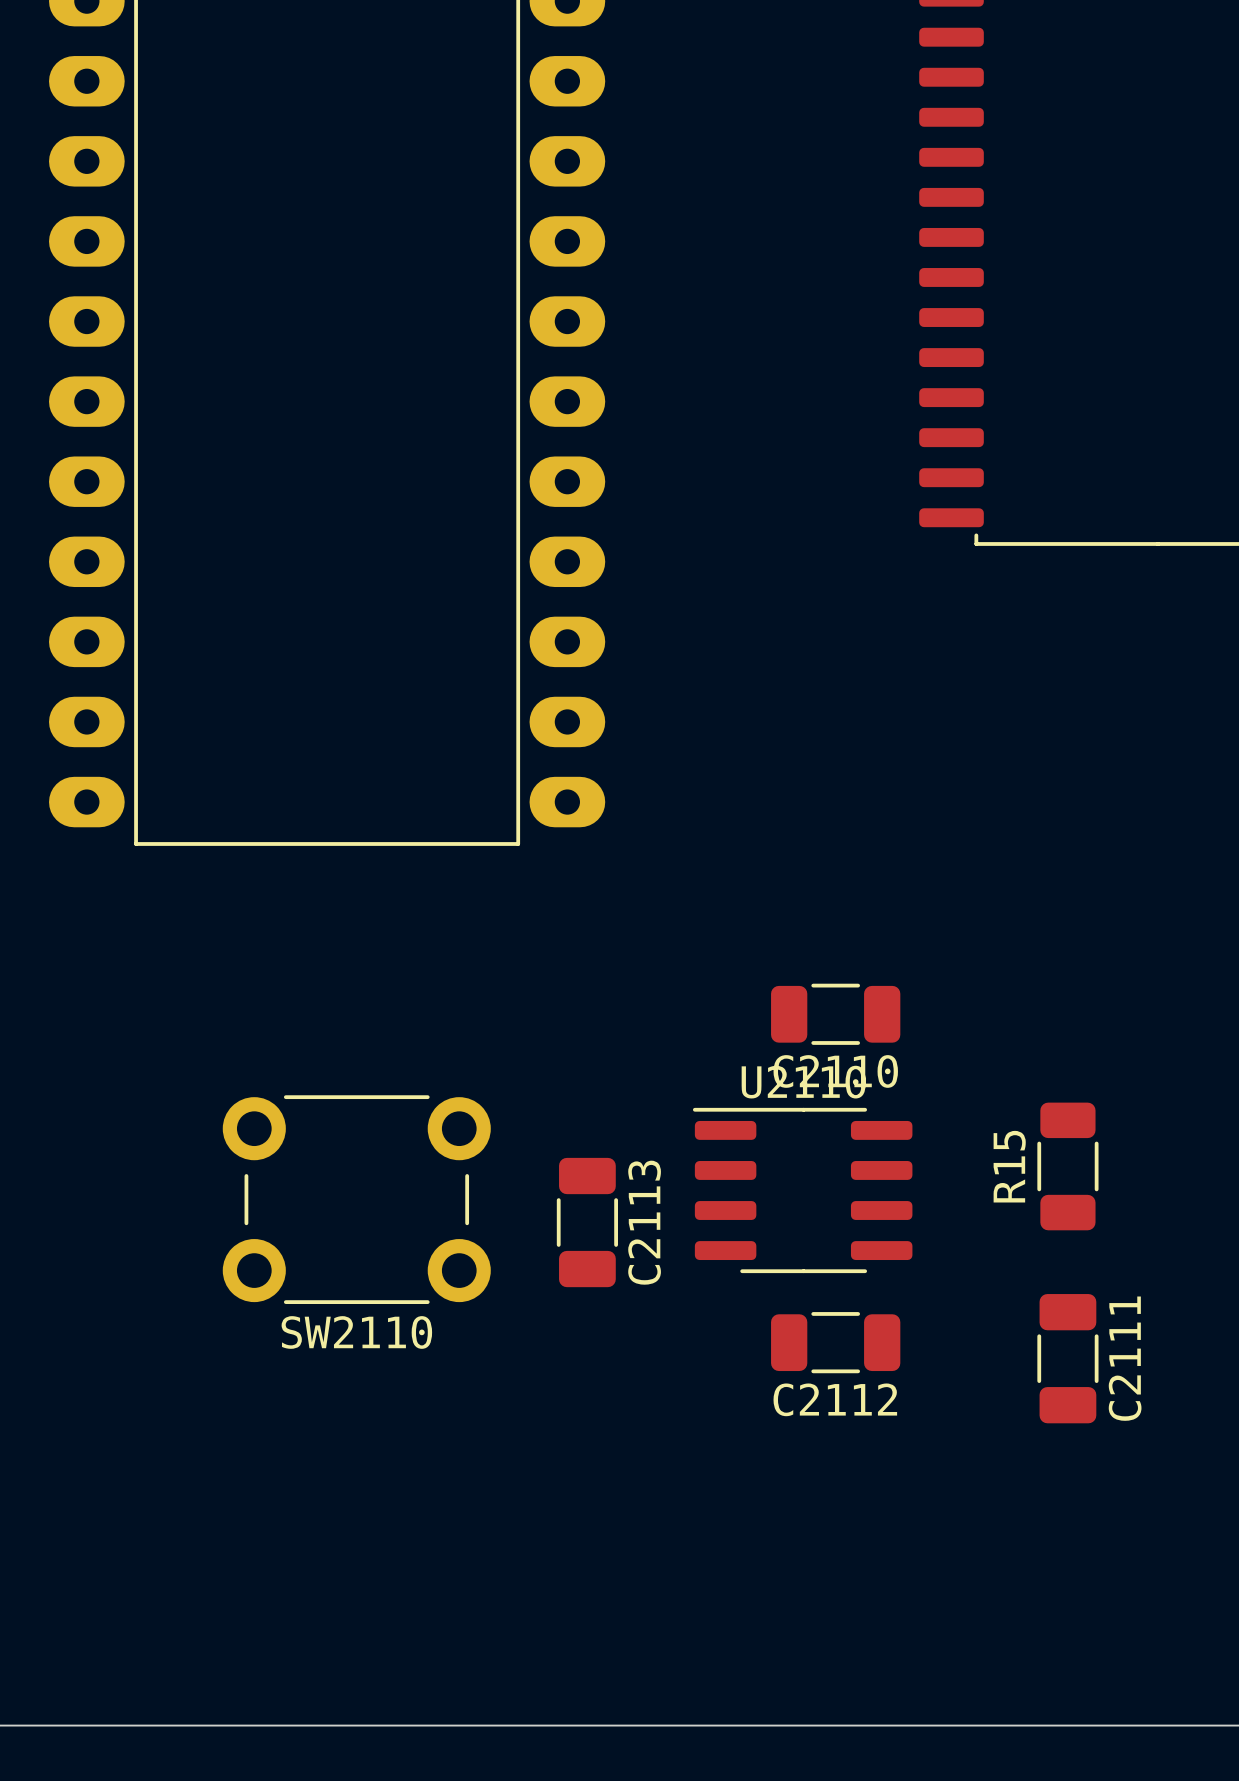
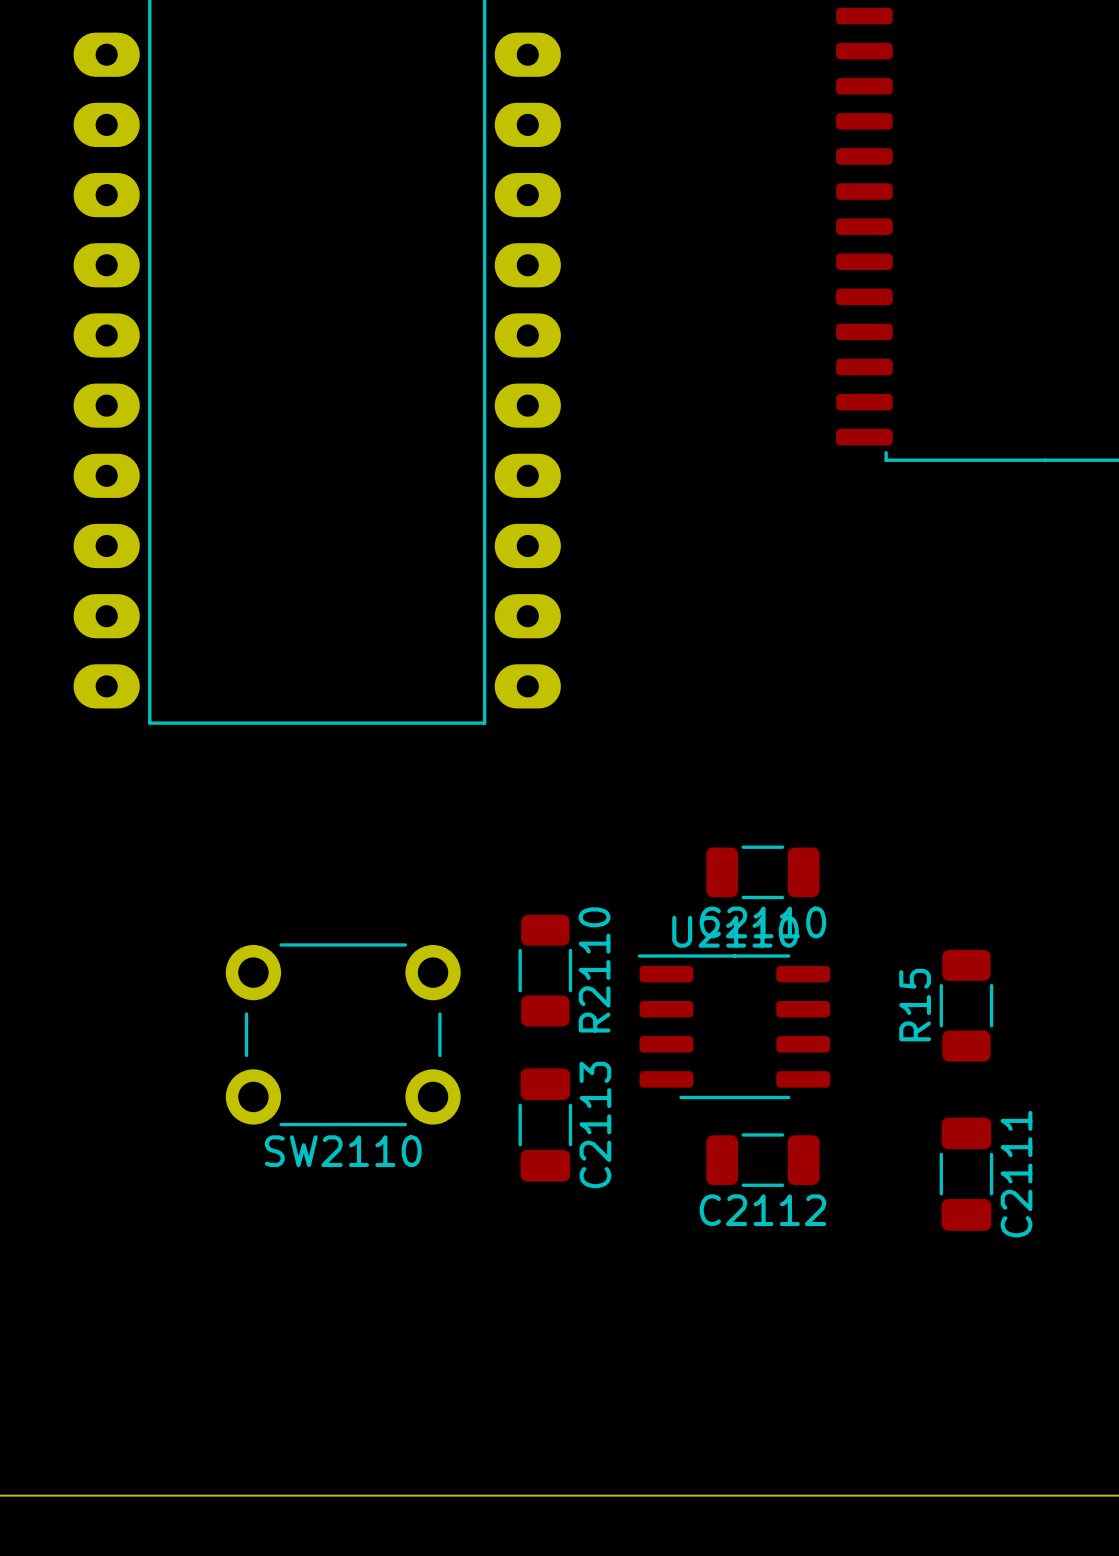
R2110: none -> (545, 970)
C2113 position: (587, 1222) -> (545, 1125)

